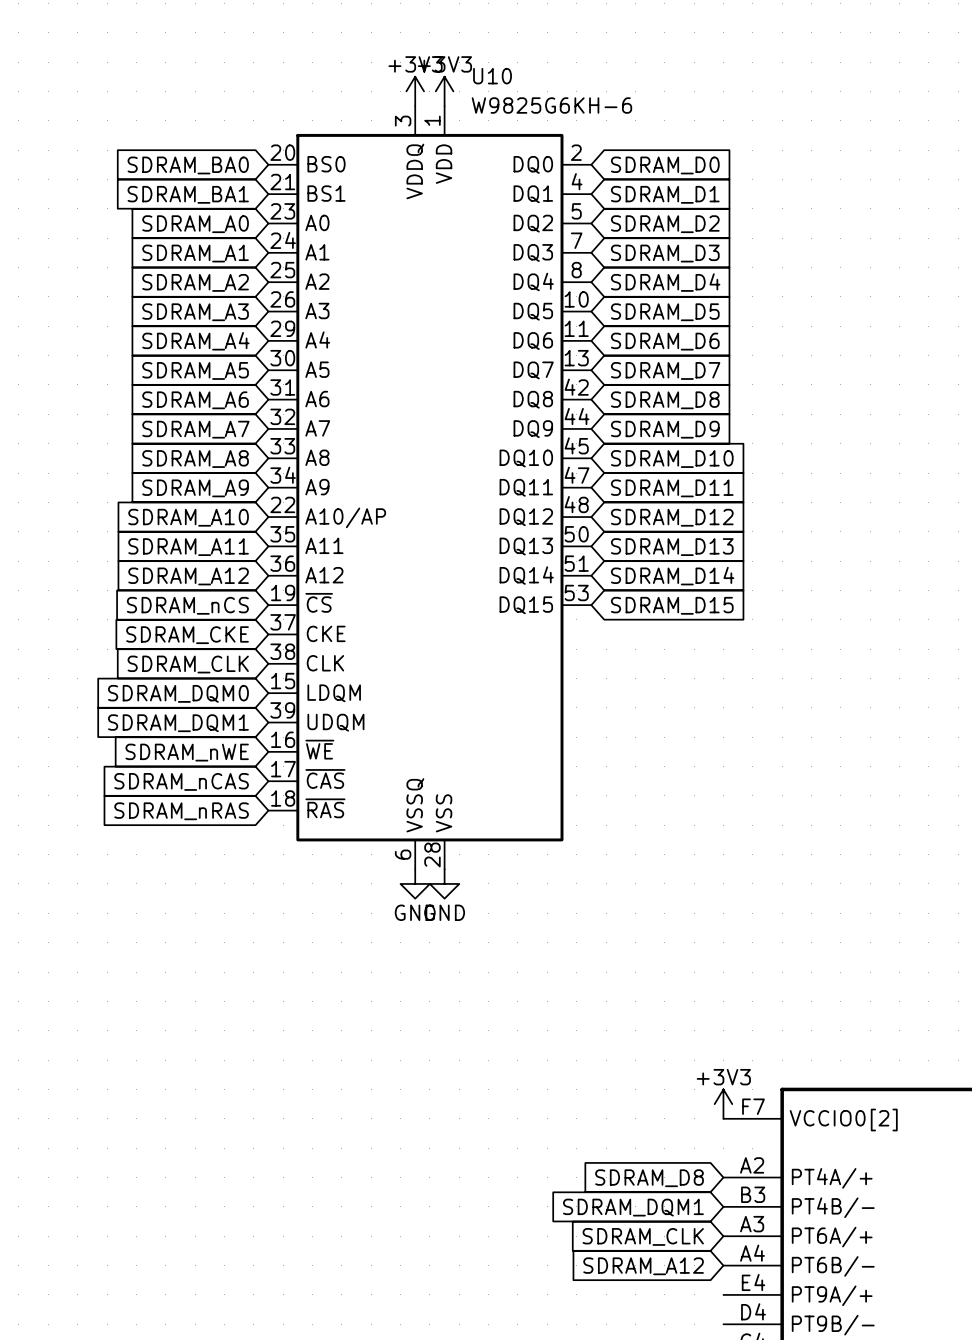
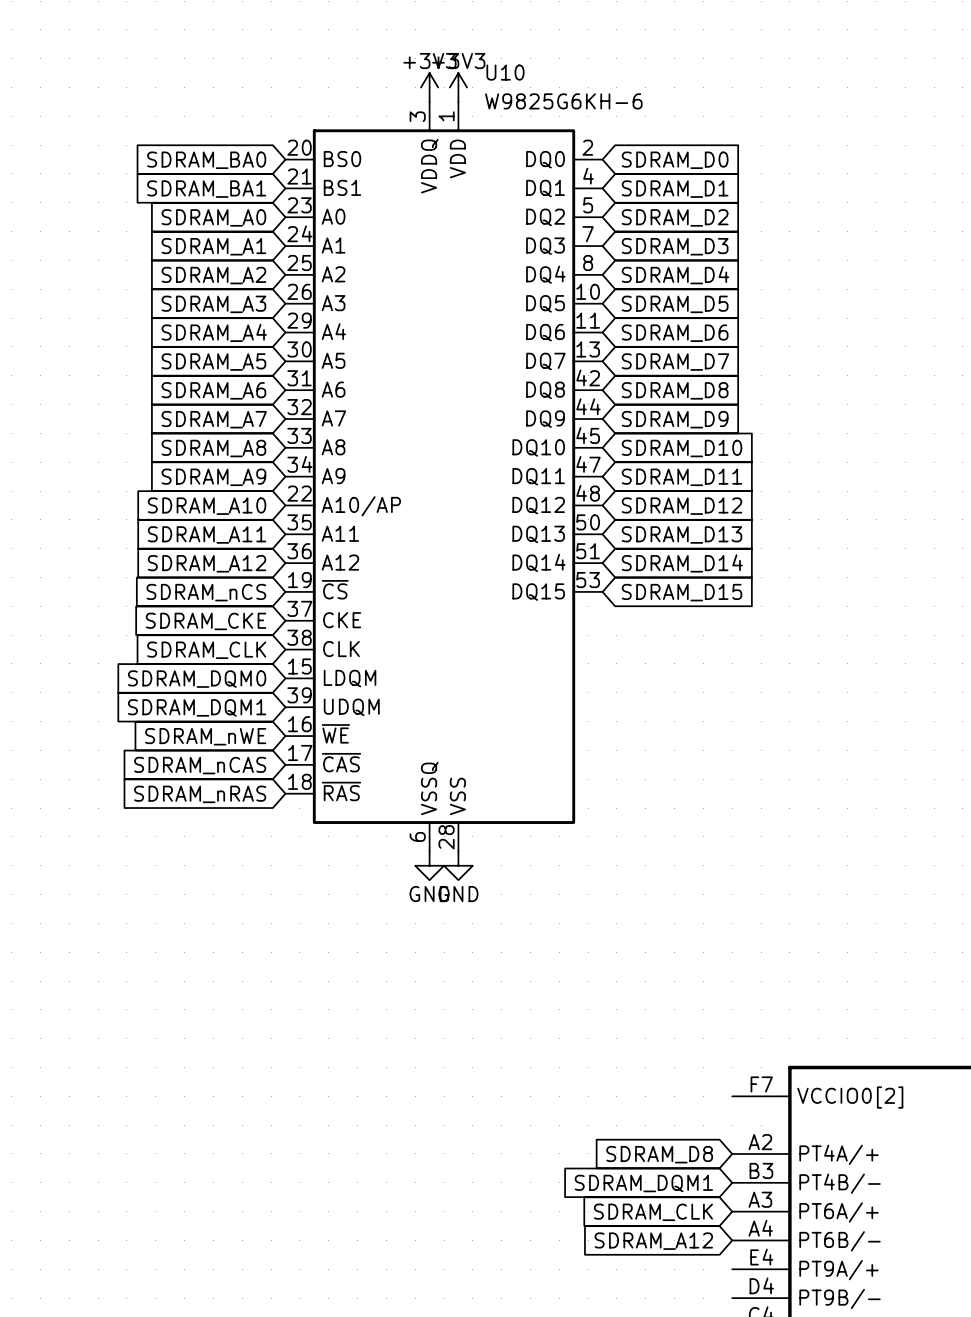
power symbol: +3V3 (723, 1104) -> none

